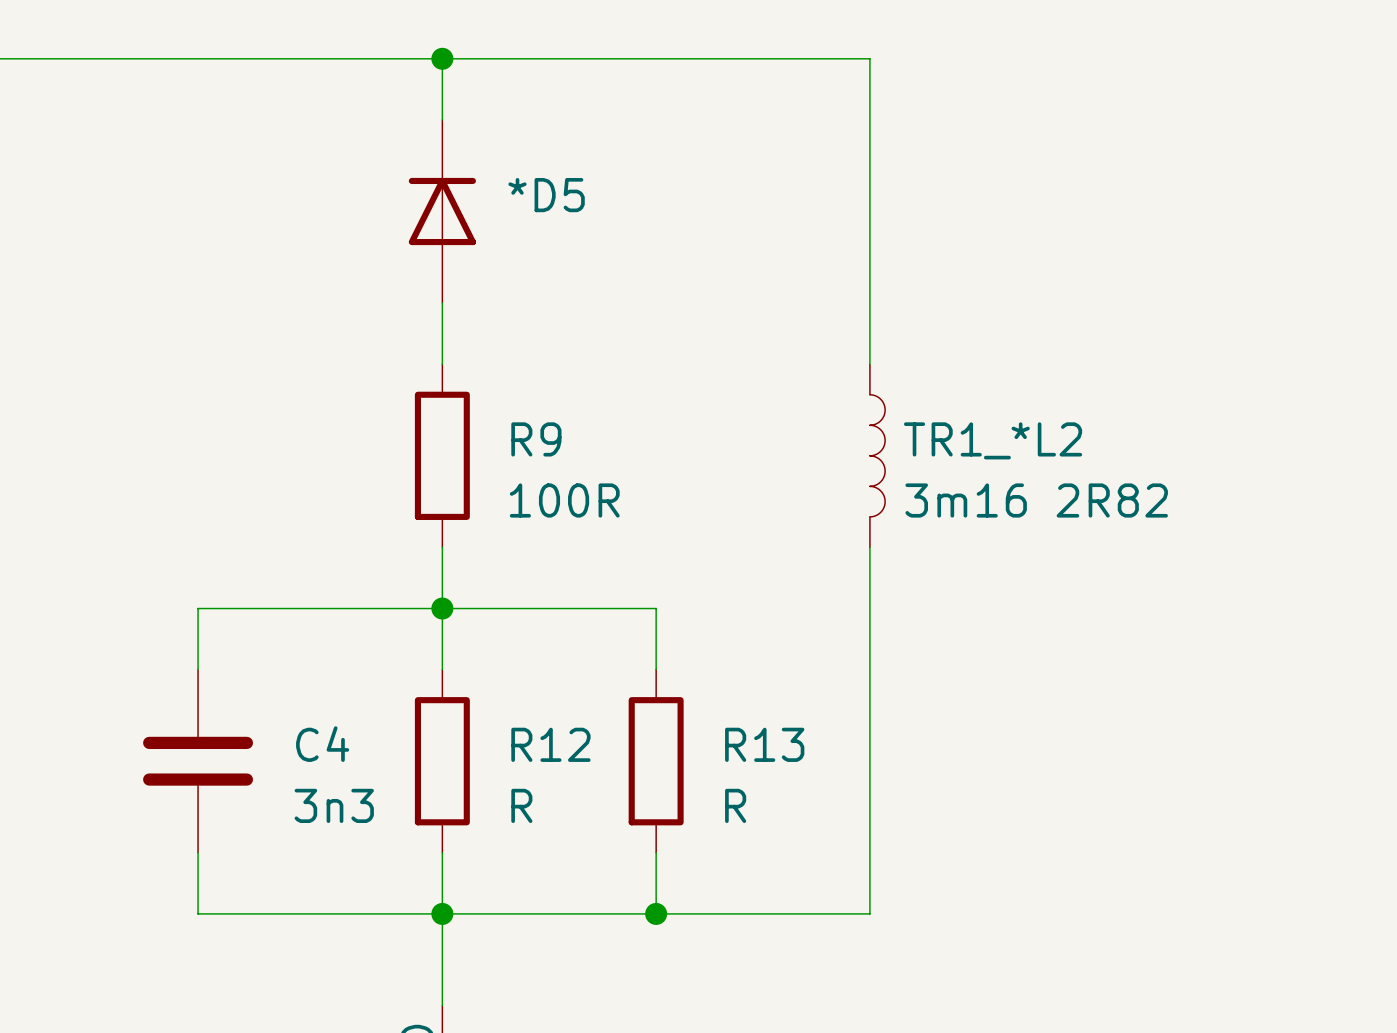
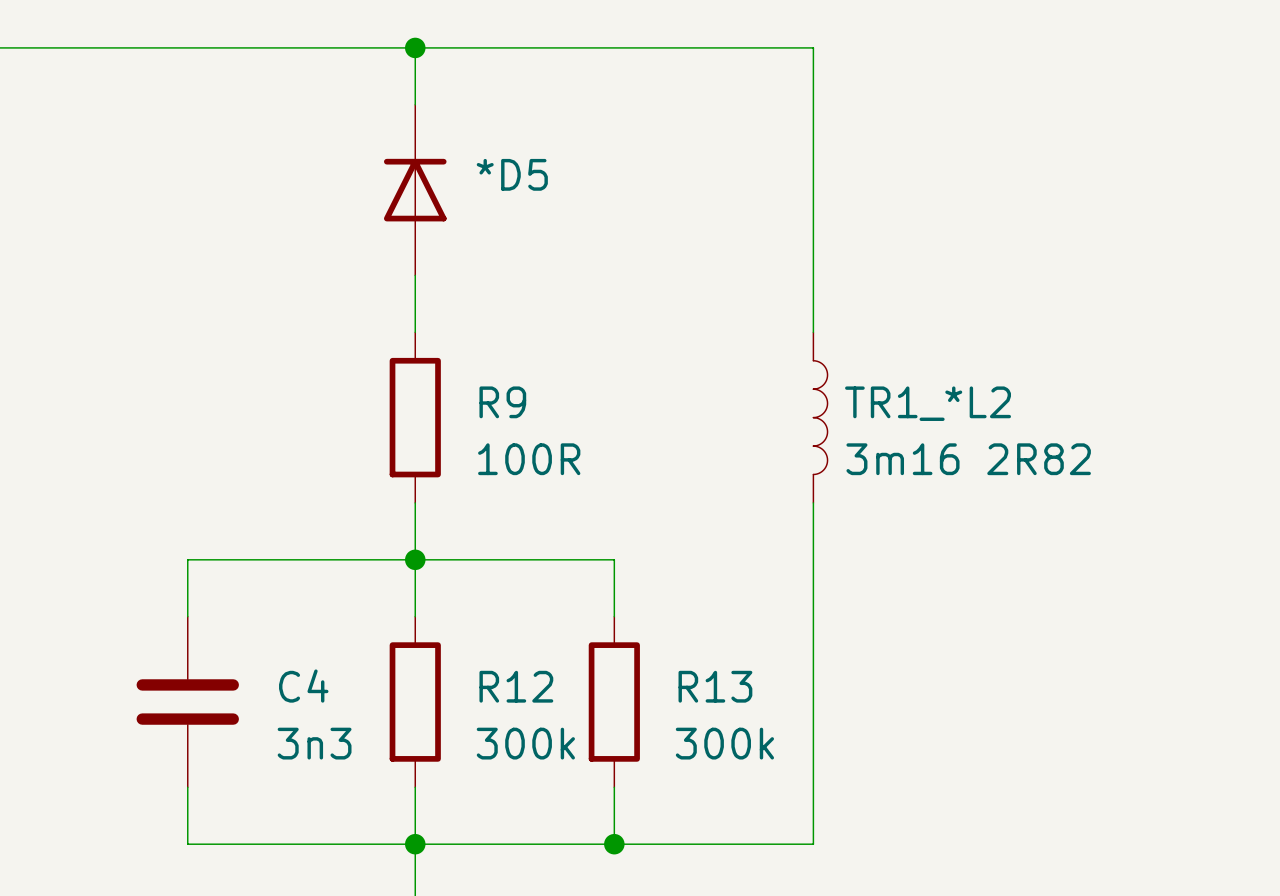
R12 value: R (521, 805) -> 300k (525, 743)
R13 value: R (735, 805) -> 300k (724, 743)

